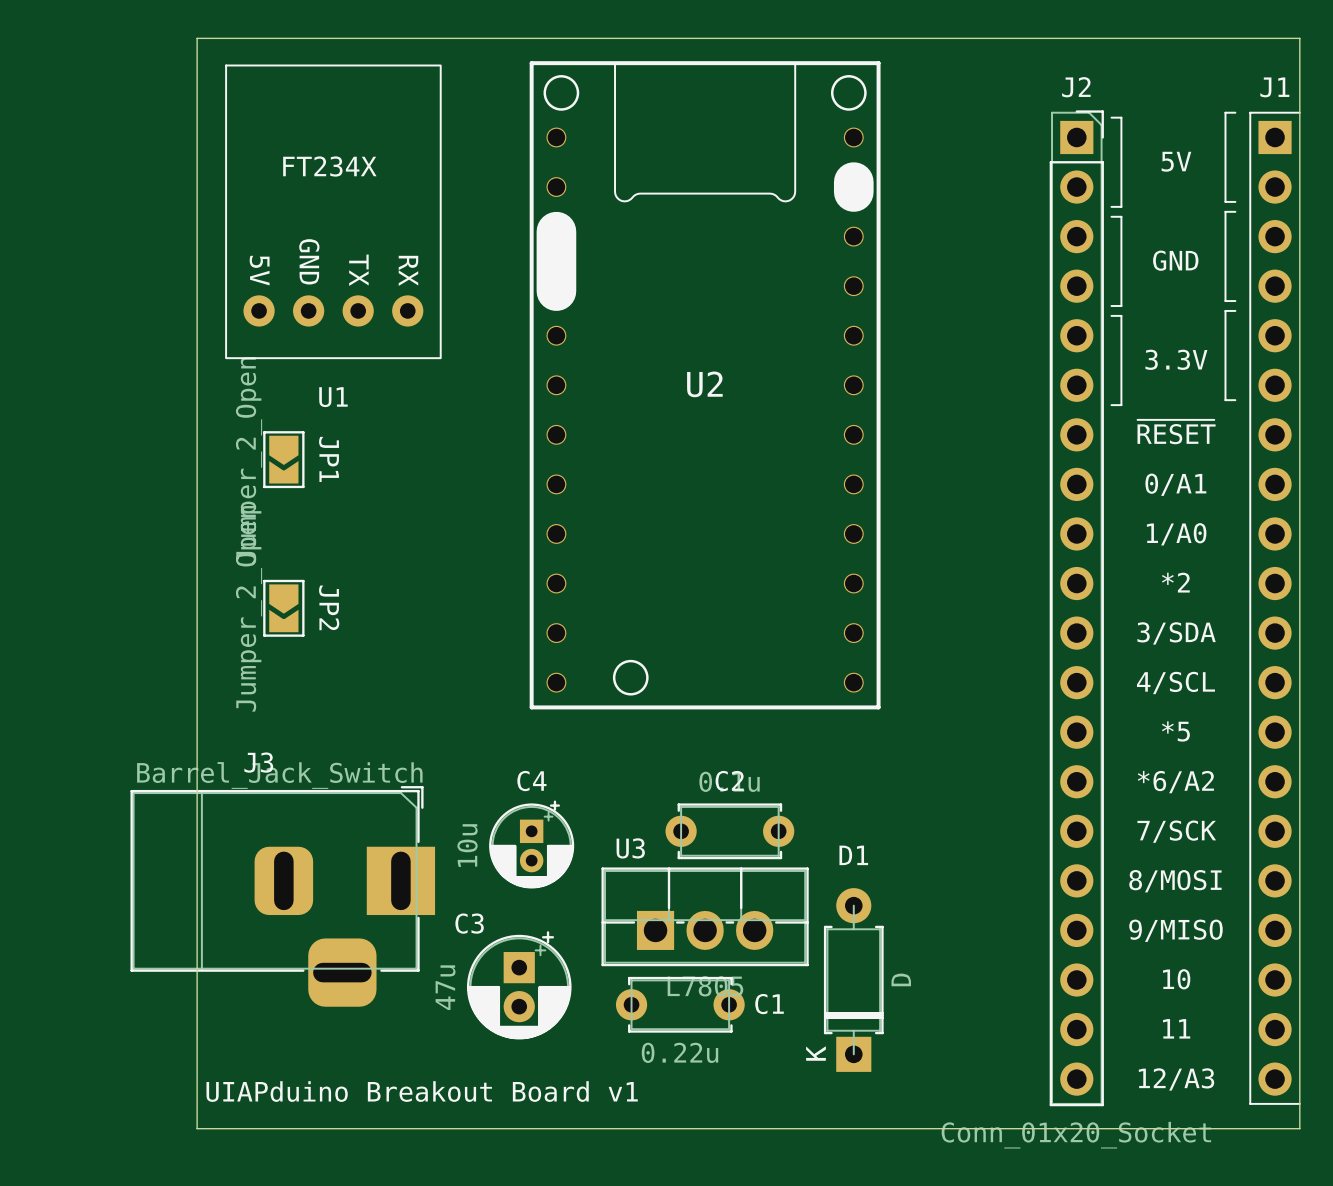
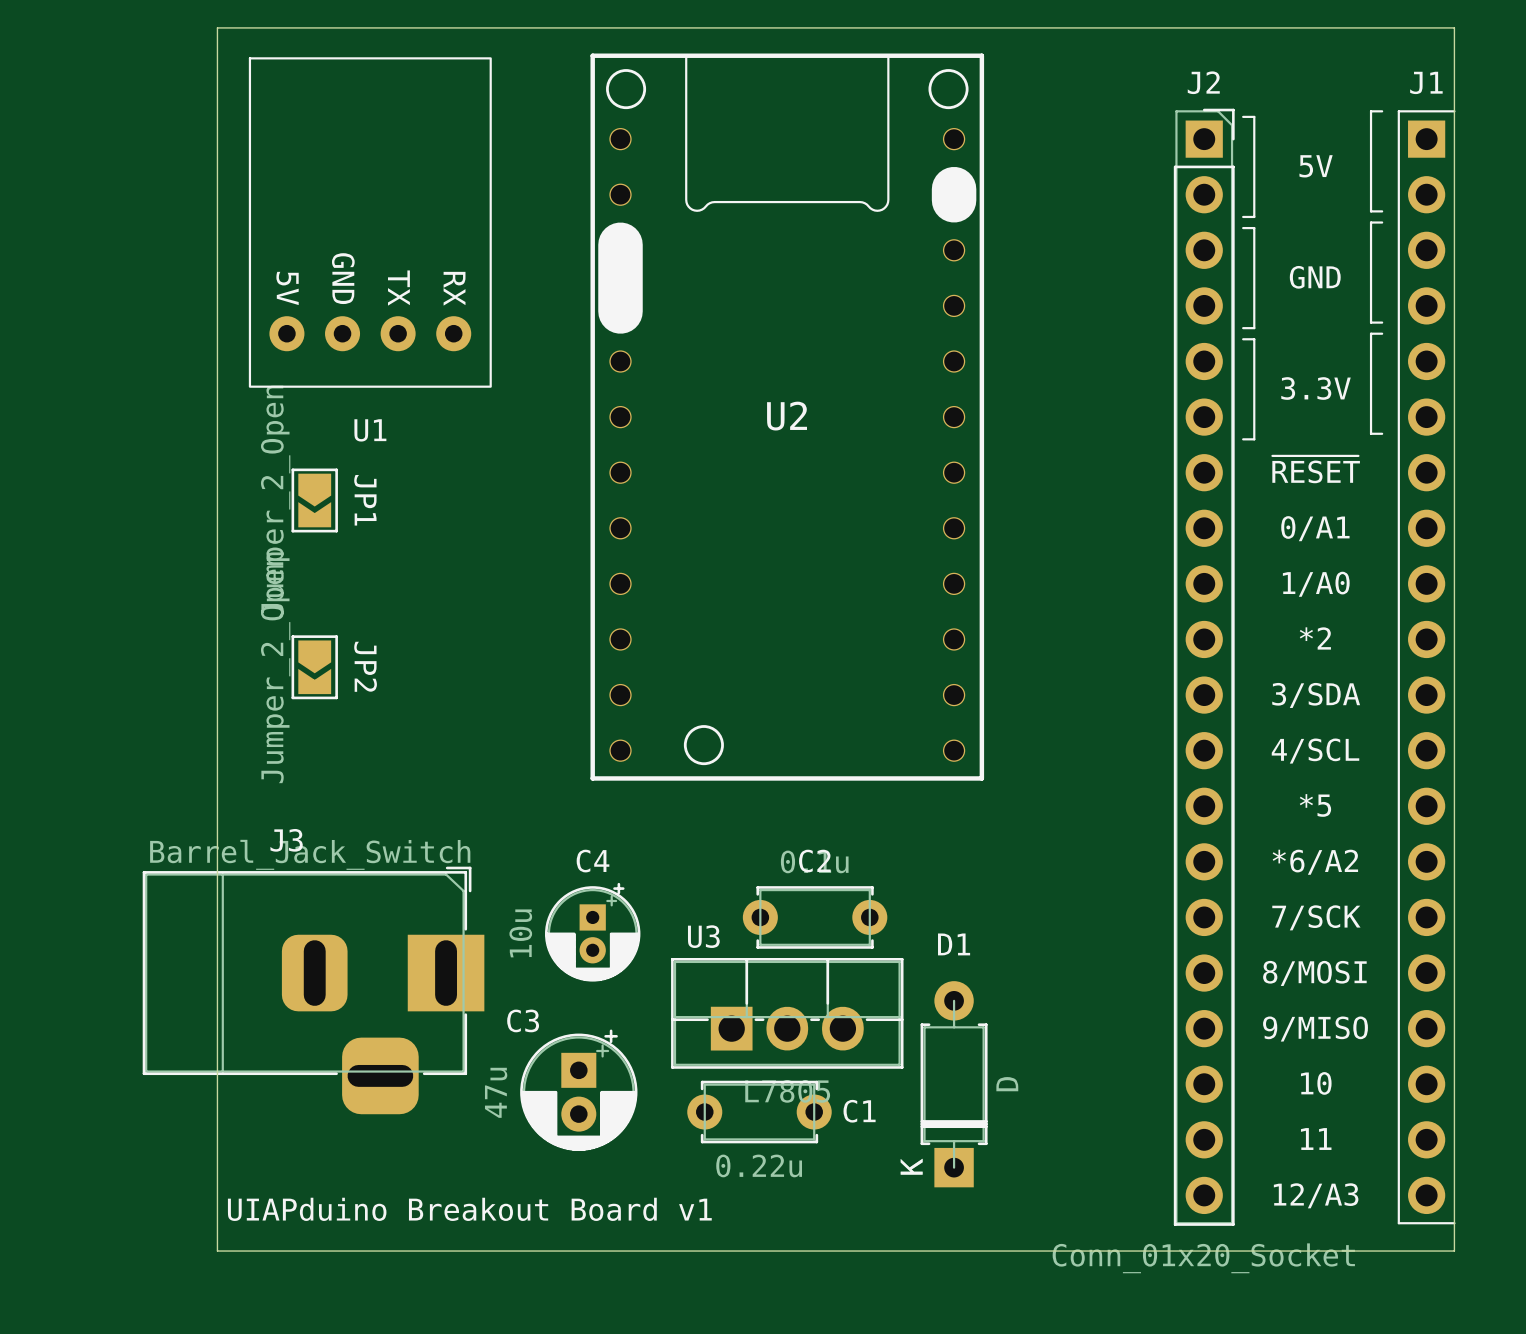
text: FT234X (329, 166) -> none

